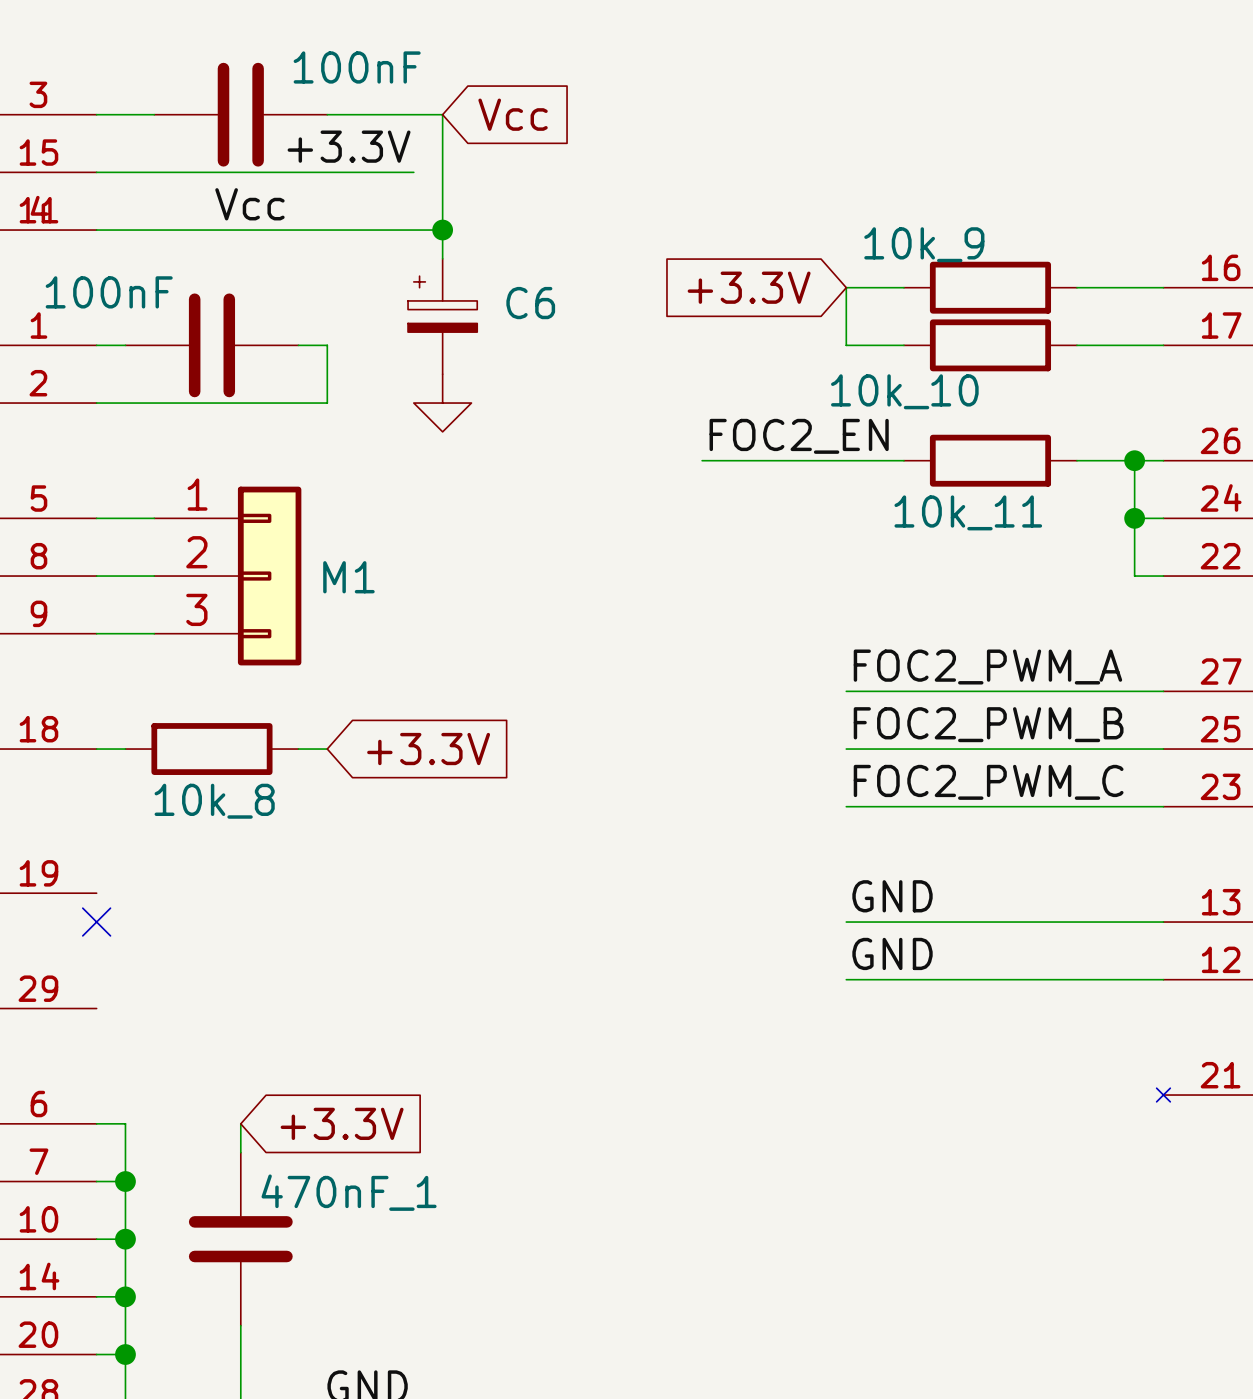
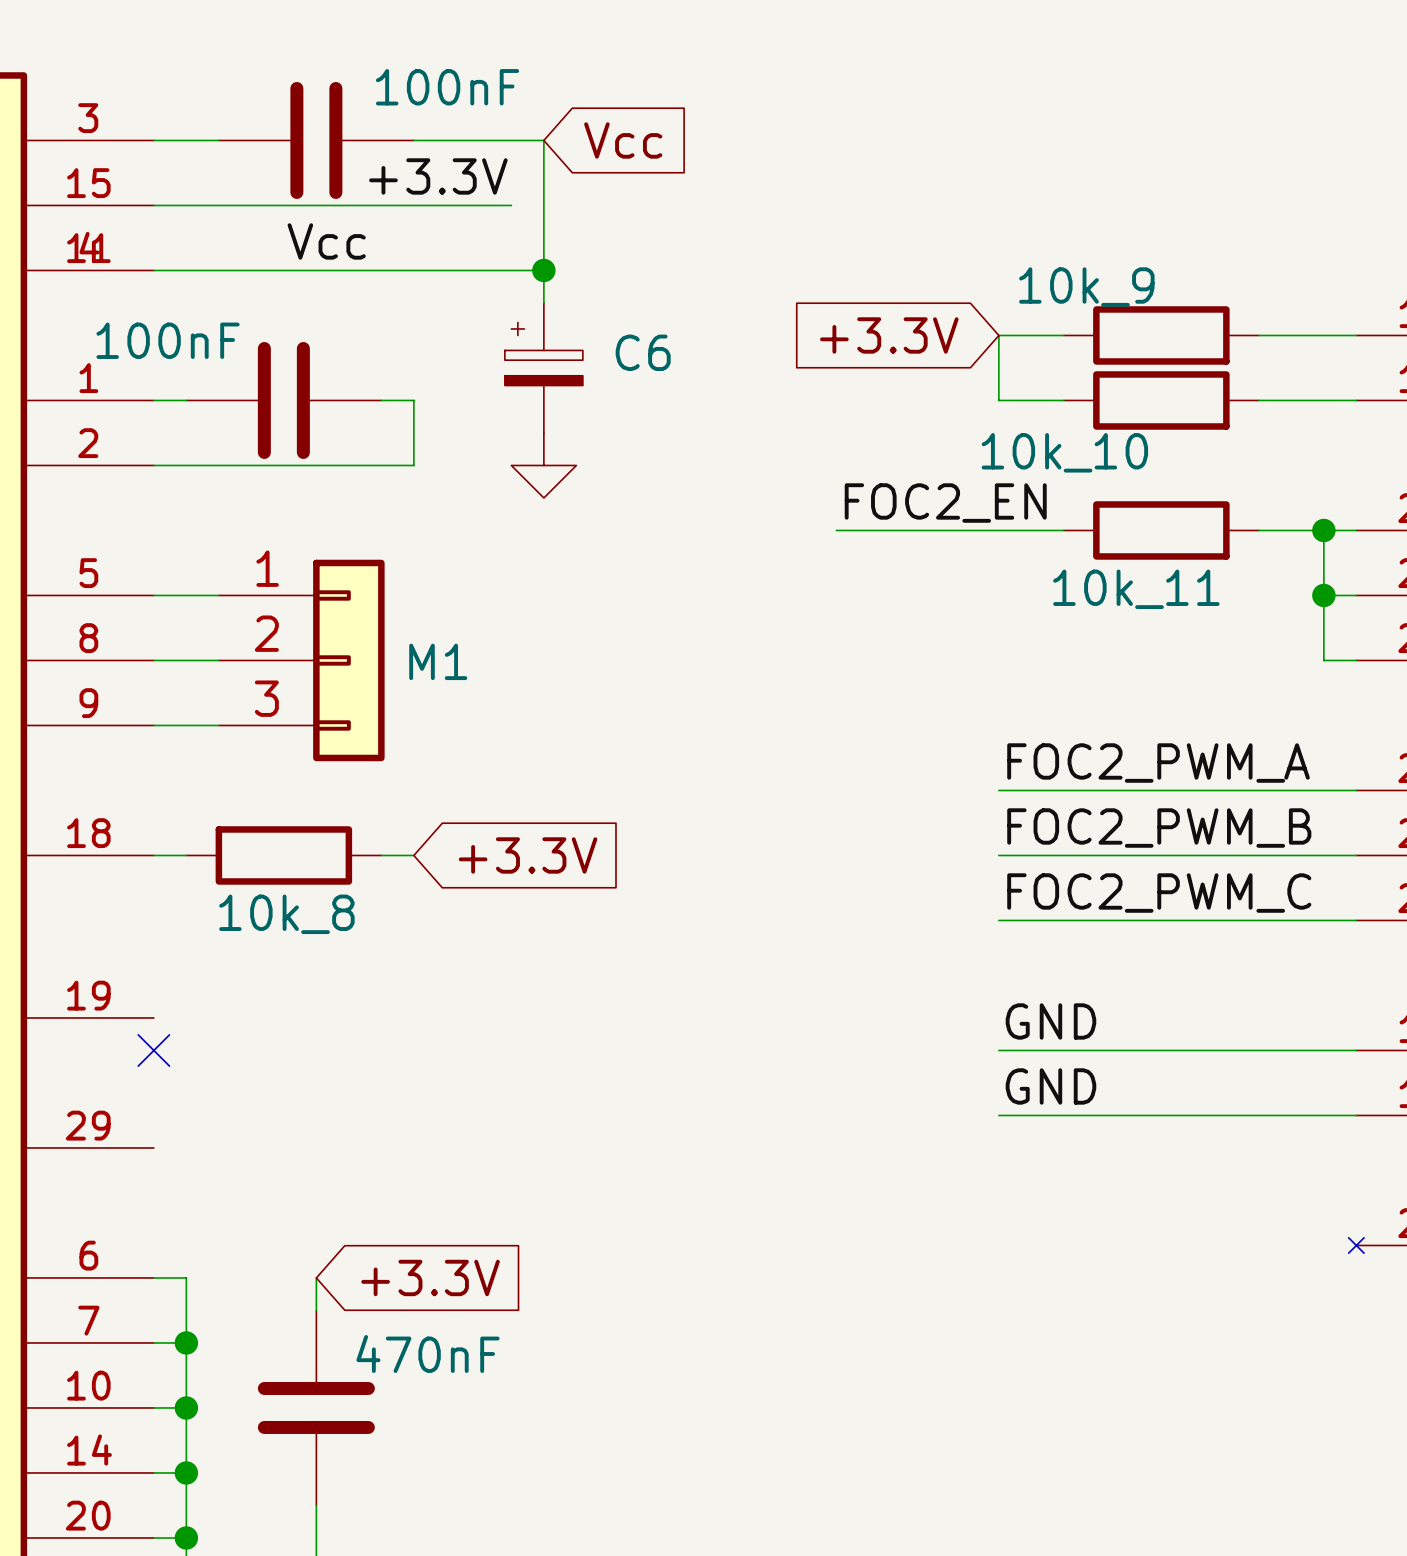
470nF_1 value: none -> 470nF (428, 1353)
470nF_1 name: 470nF_1 (349, 1192) -> none

